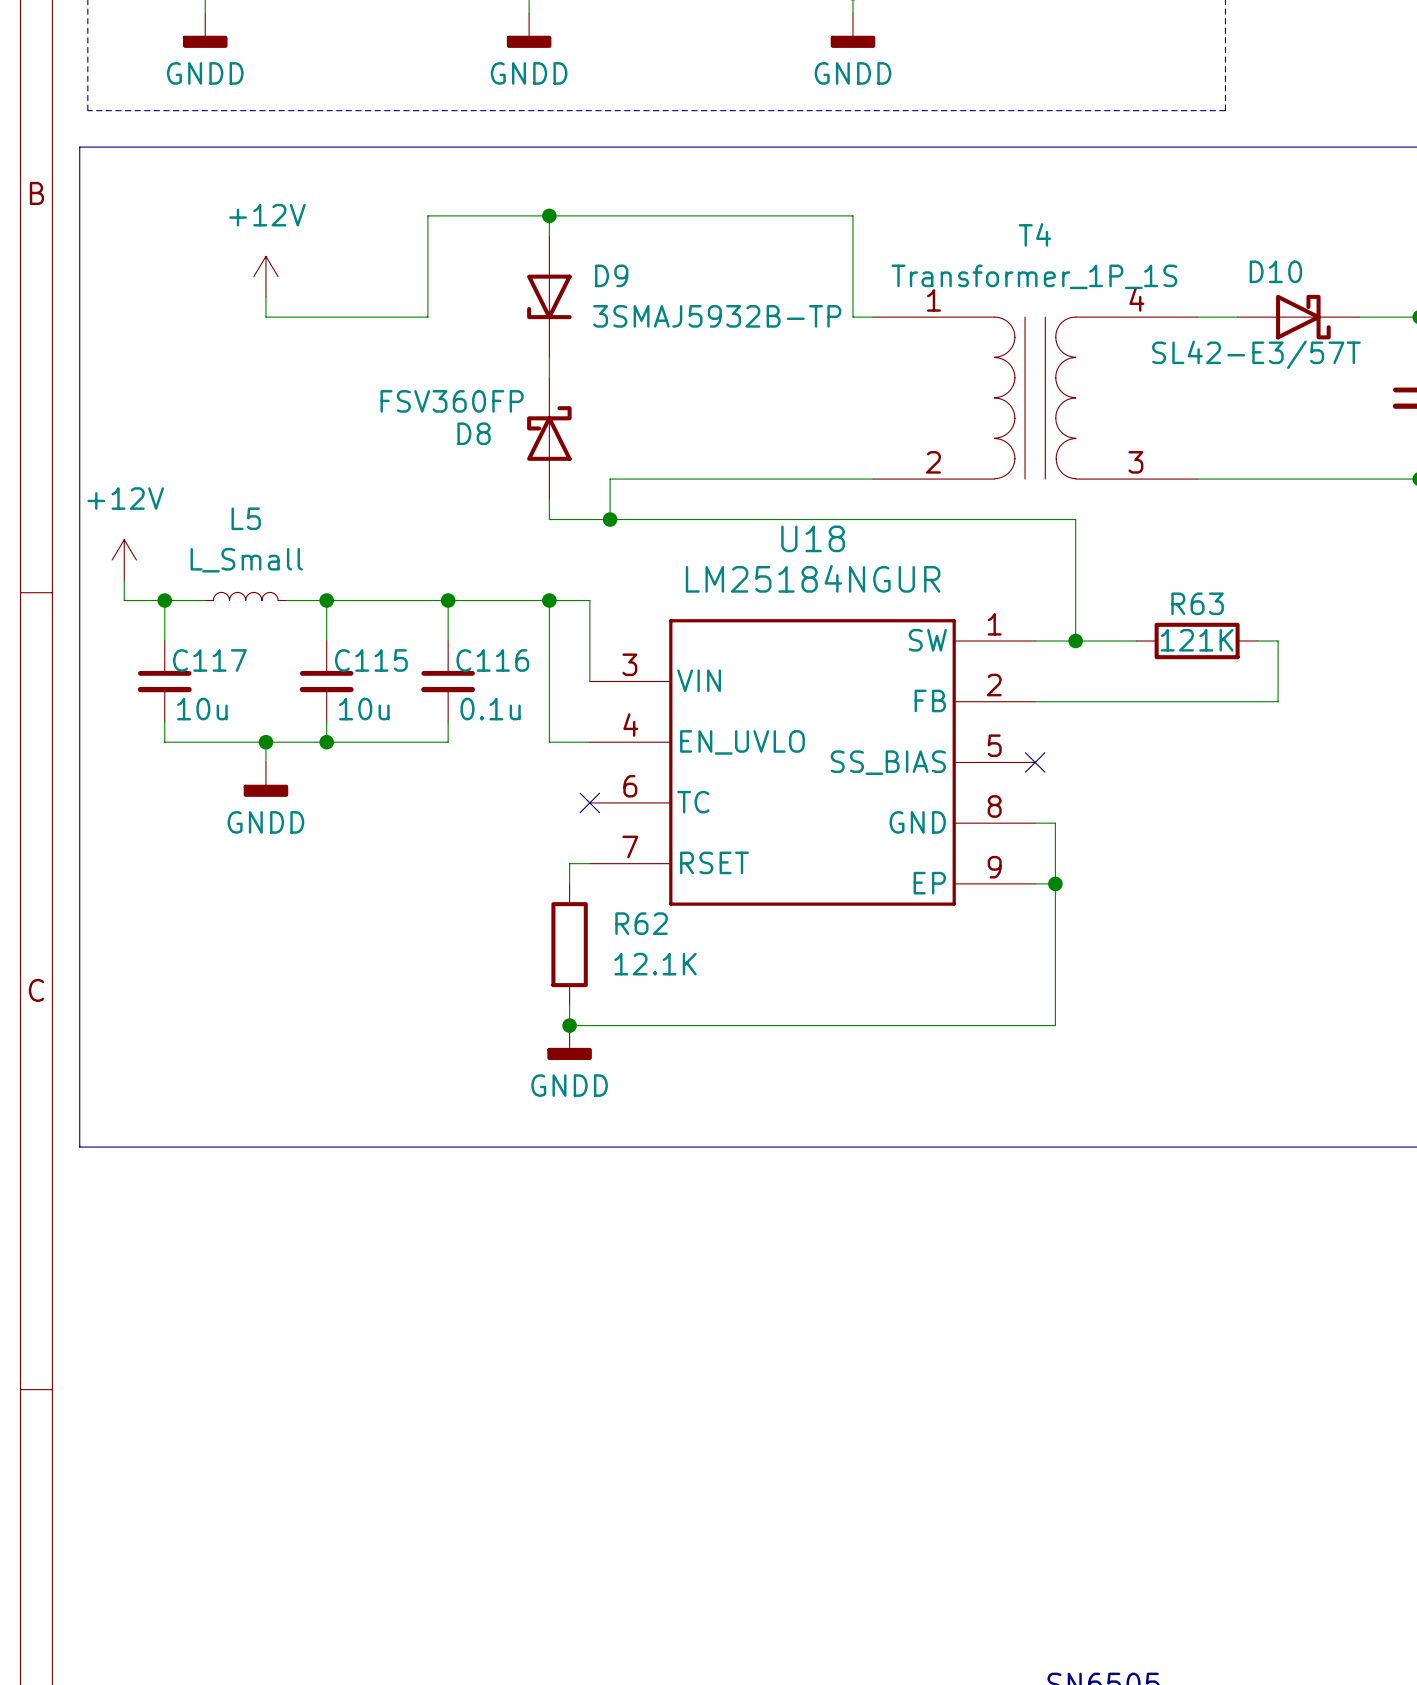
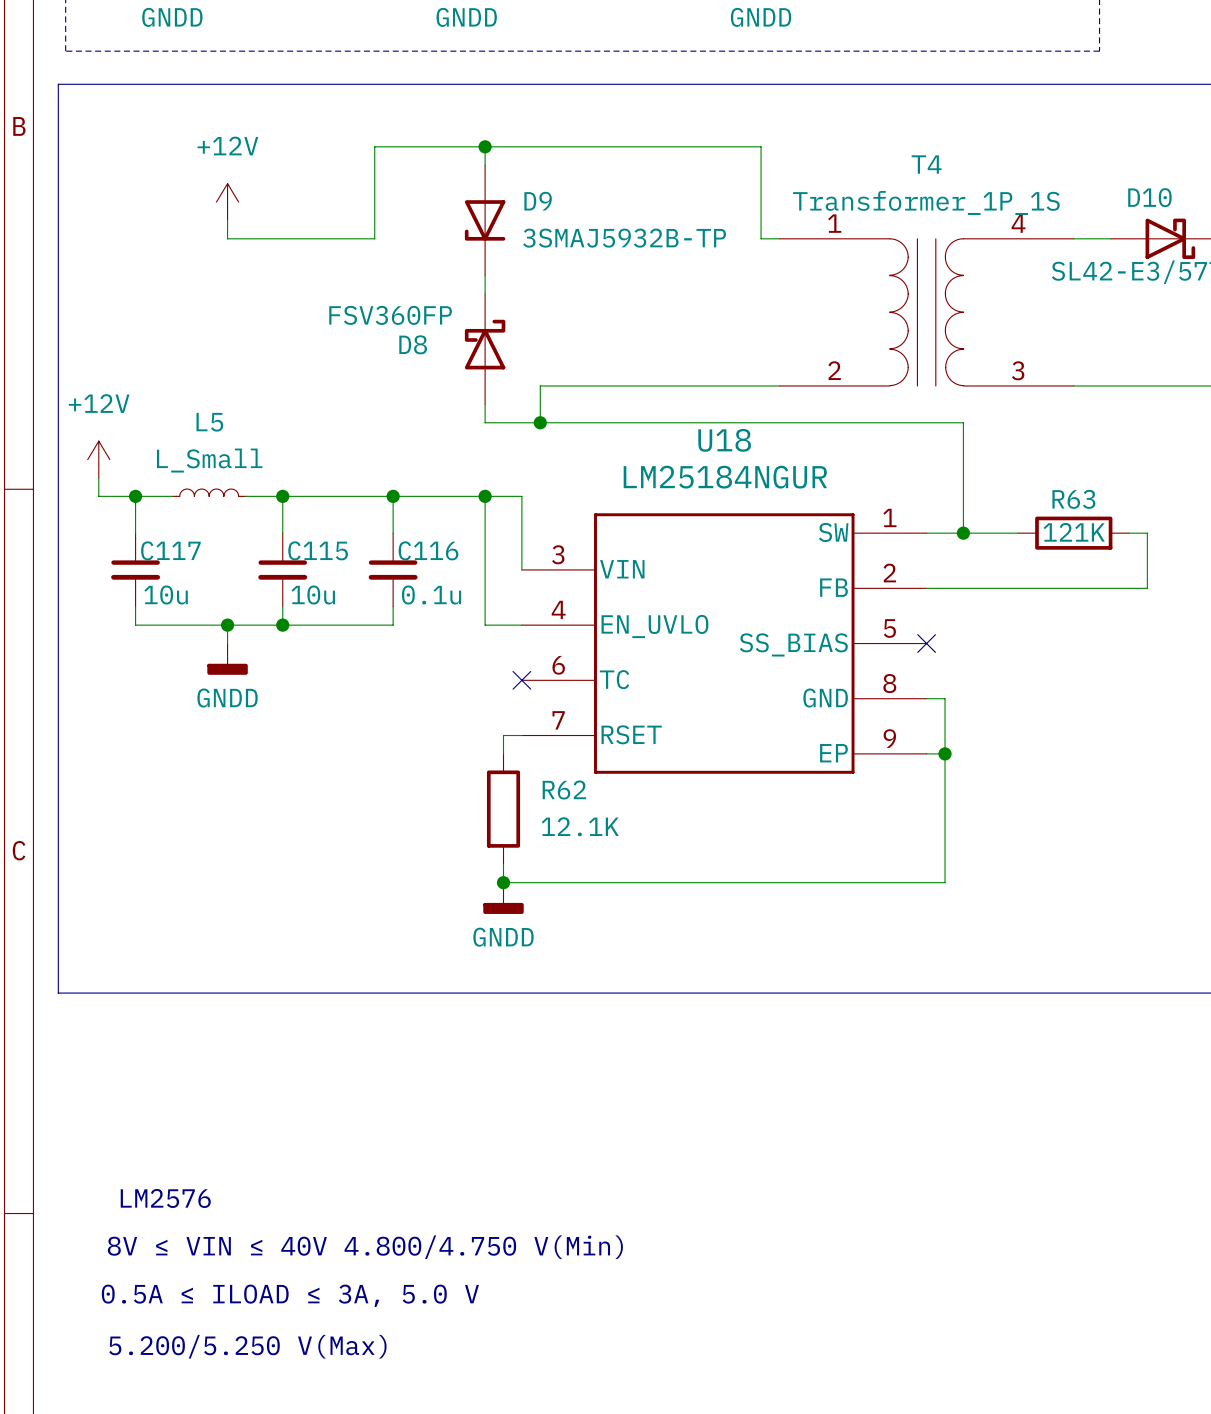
text: none -> LM2576 (165, 1198)
text: none -> 8V ≤ VIN ≤ 40V 4.800/4.750 V(Min) (365, 1247)
text: none -> 0.5A ≤ ILOAD ≤ 3A, 5.0 V (290, 1295)
text: none -> 5.200/5.250 V(Max) (247, 1346)

